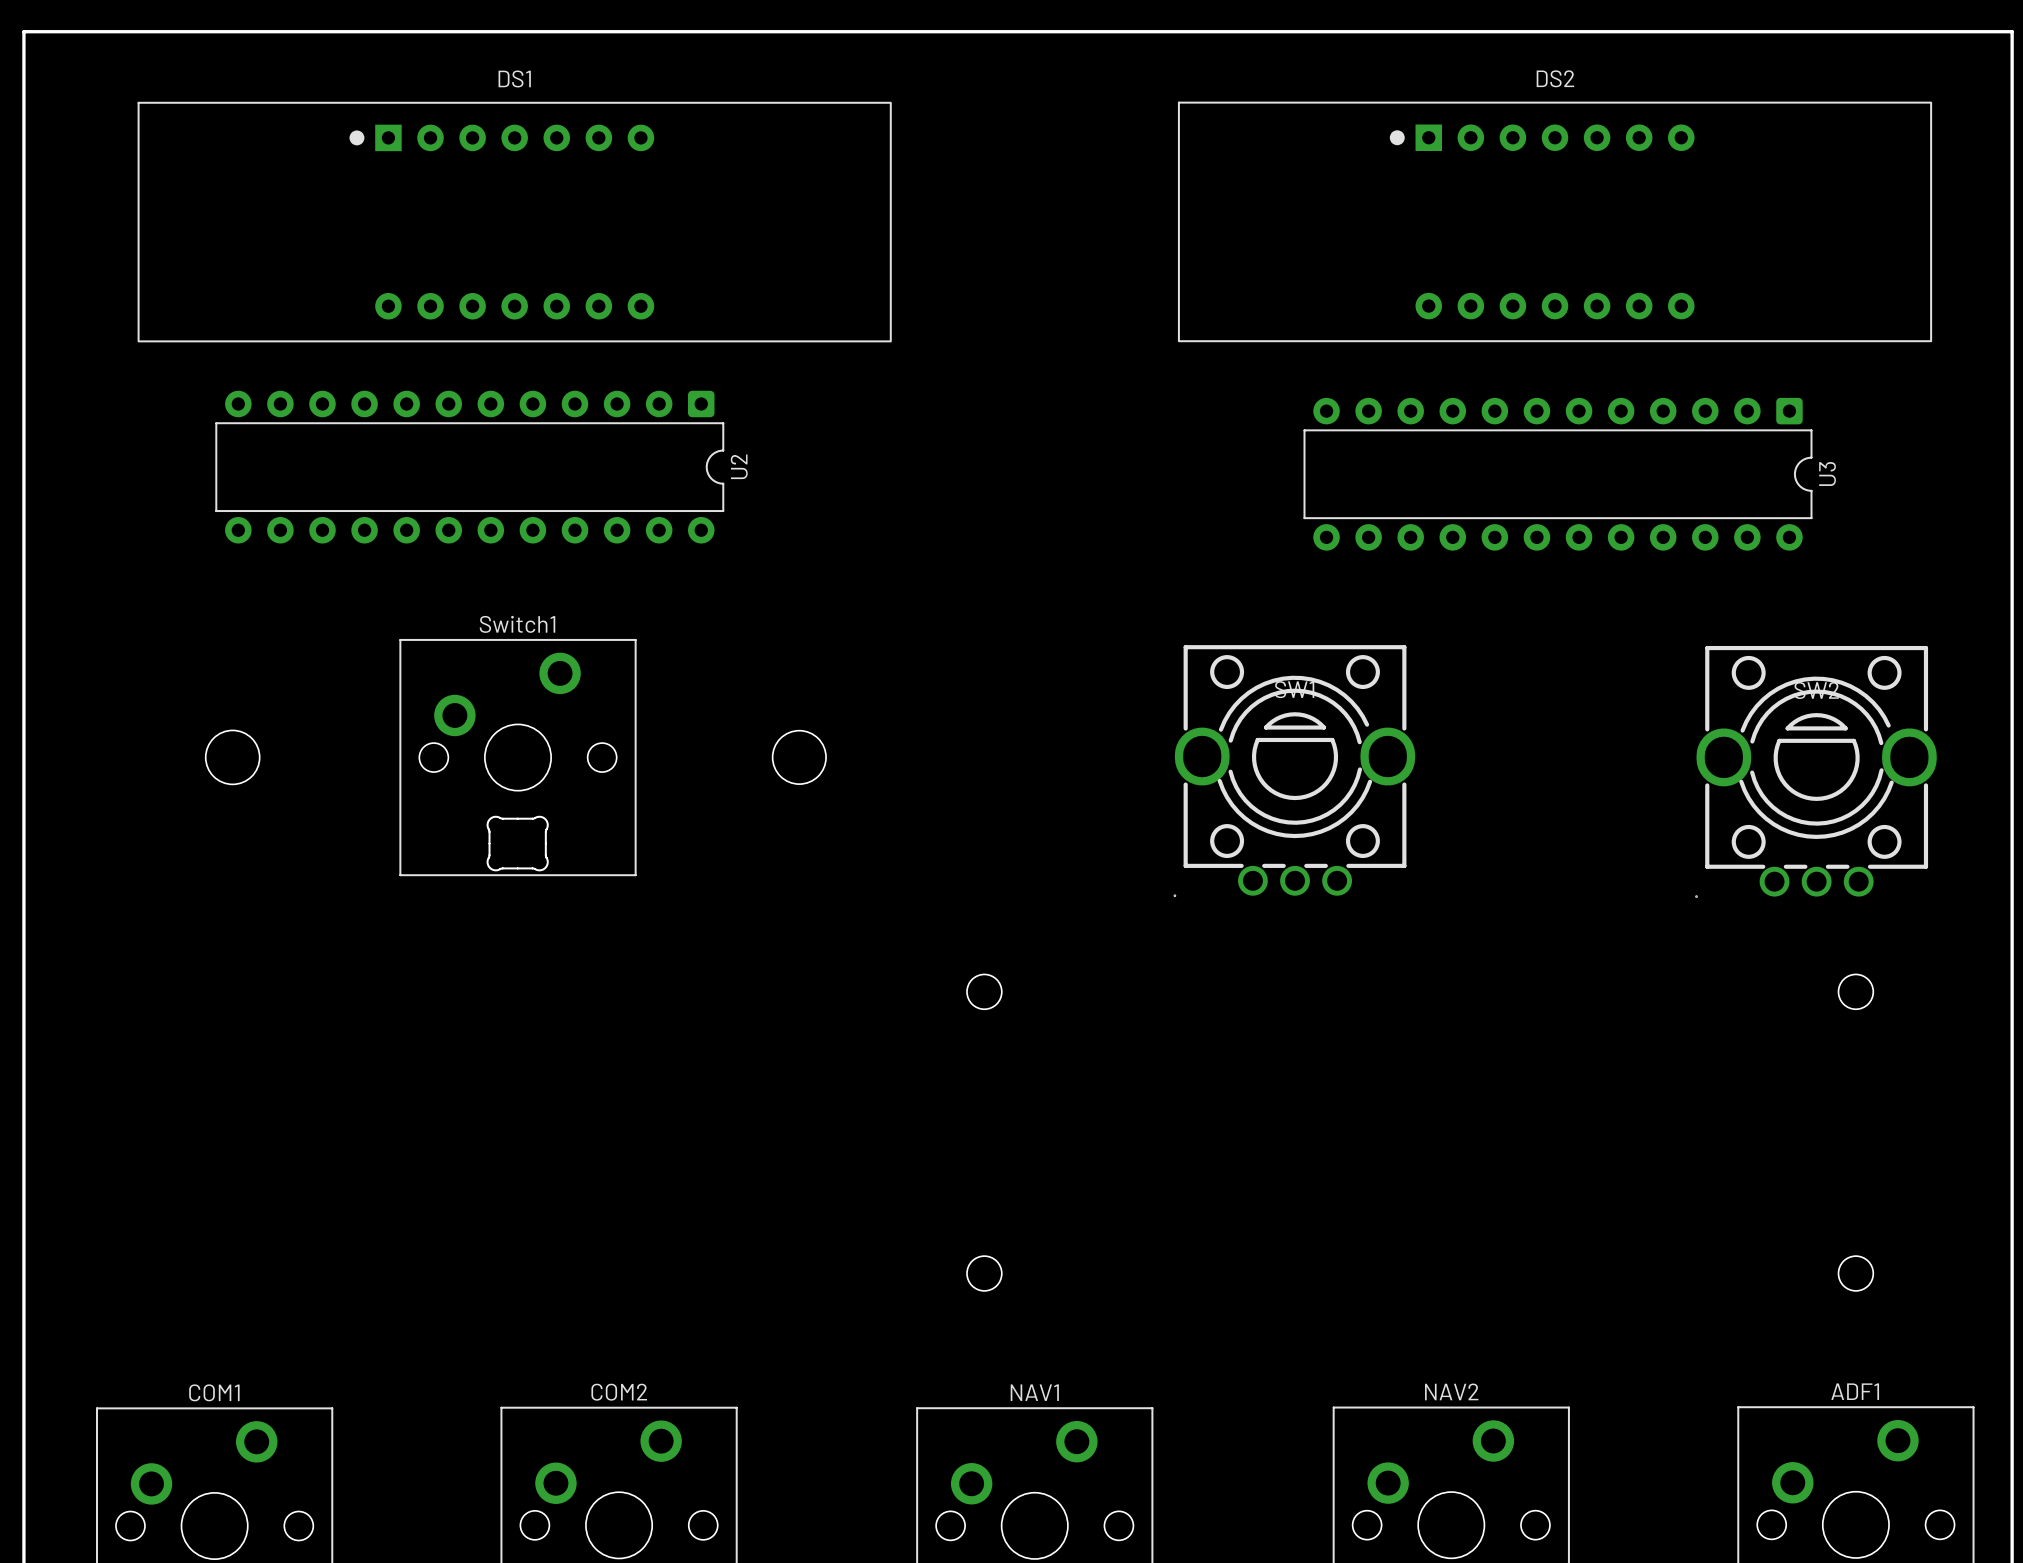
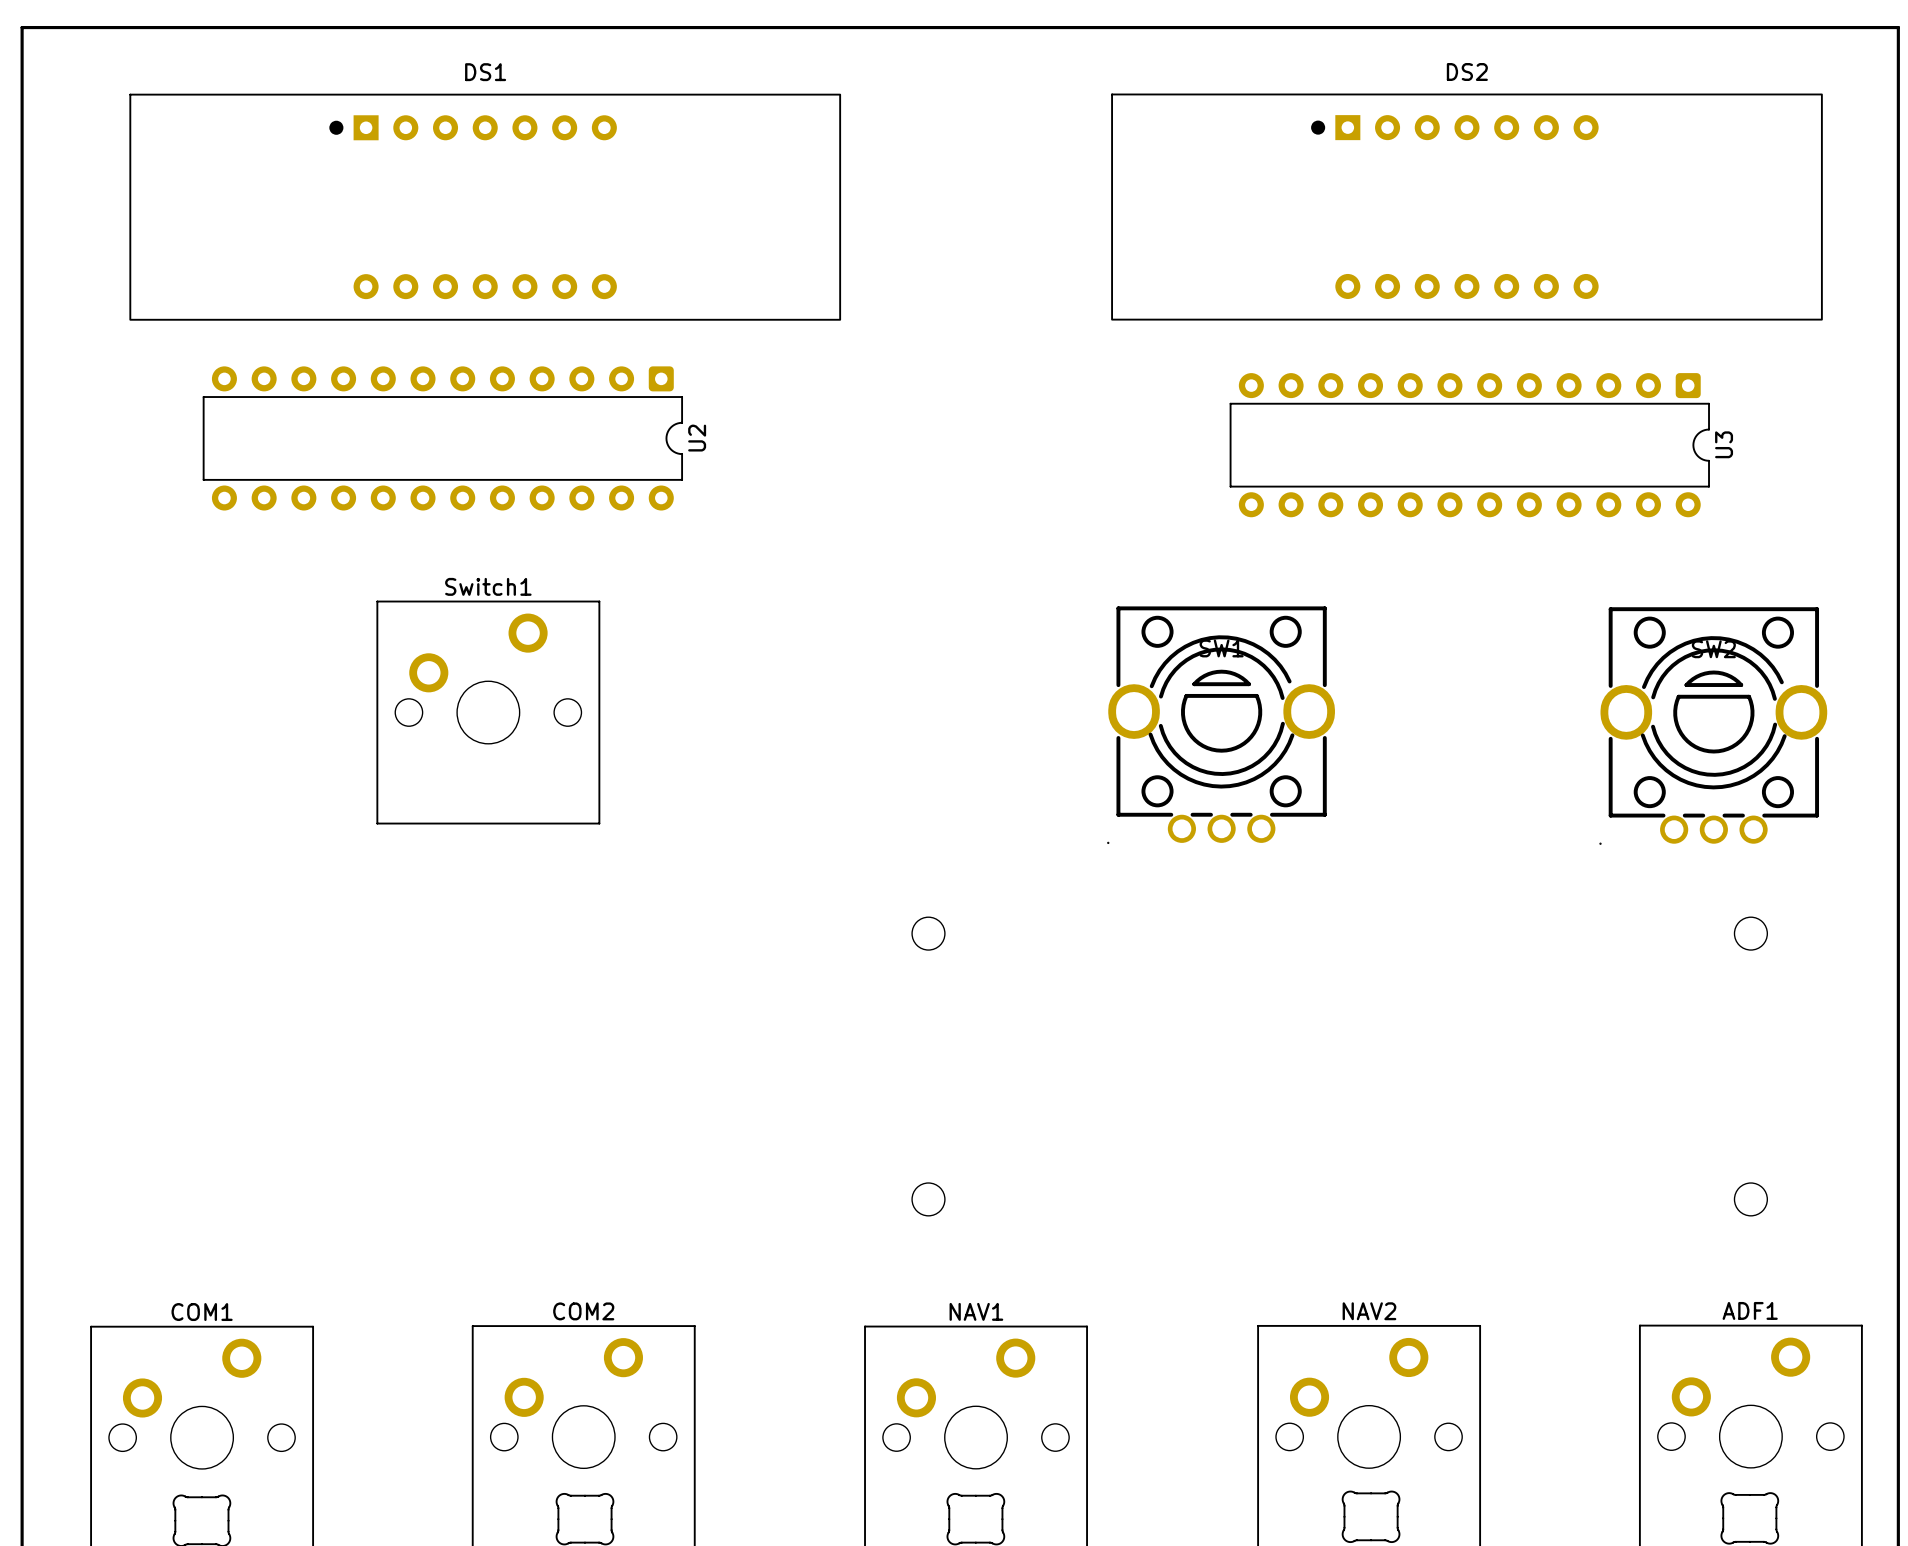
round board edge: [205, 730, 261, 785] -> none
round board edge: [772, 730, 827, 785] -> none
part: (517, 843) -> none

